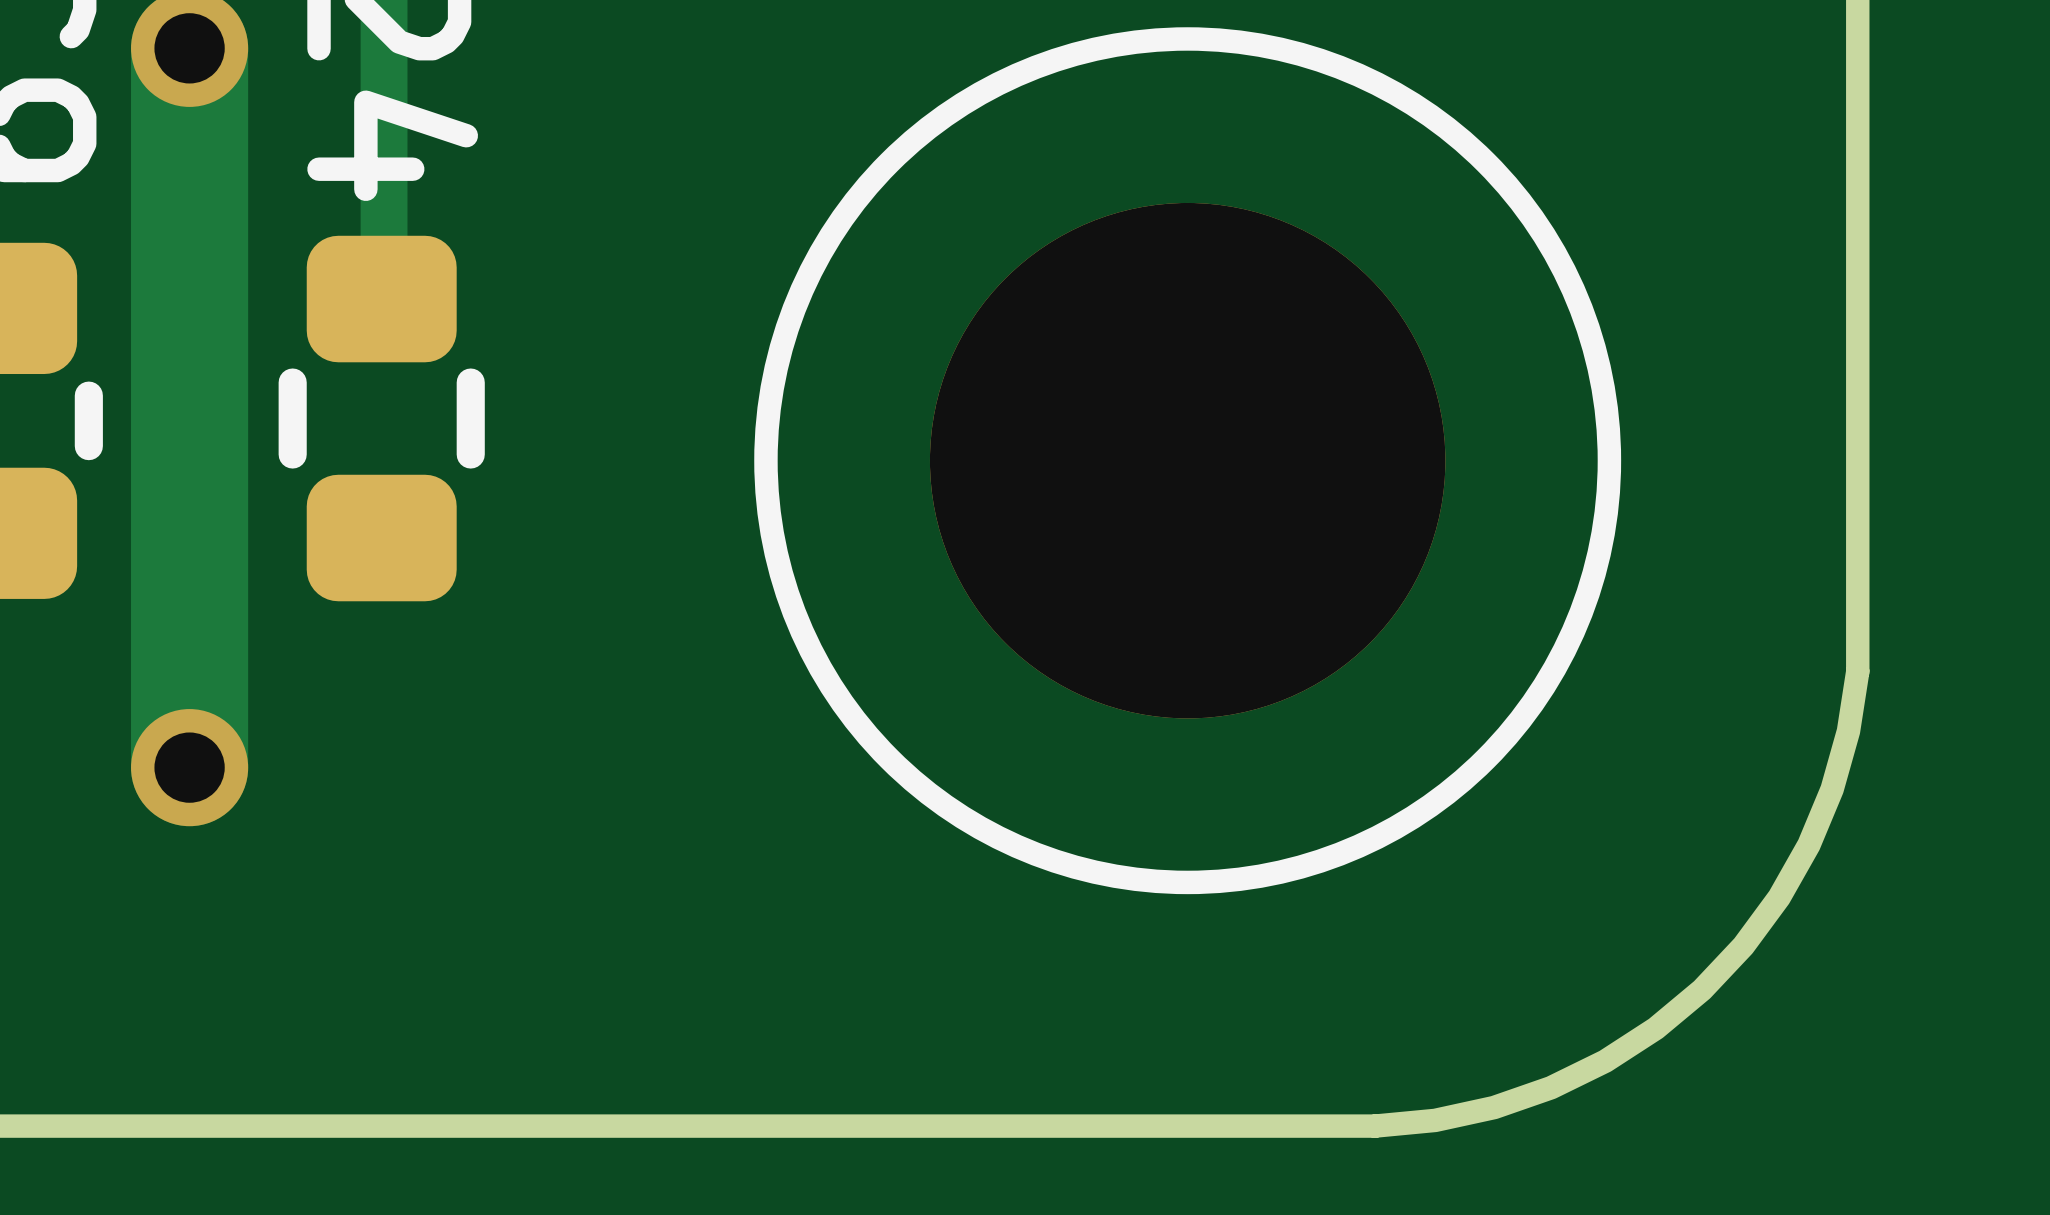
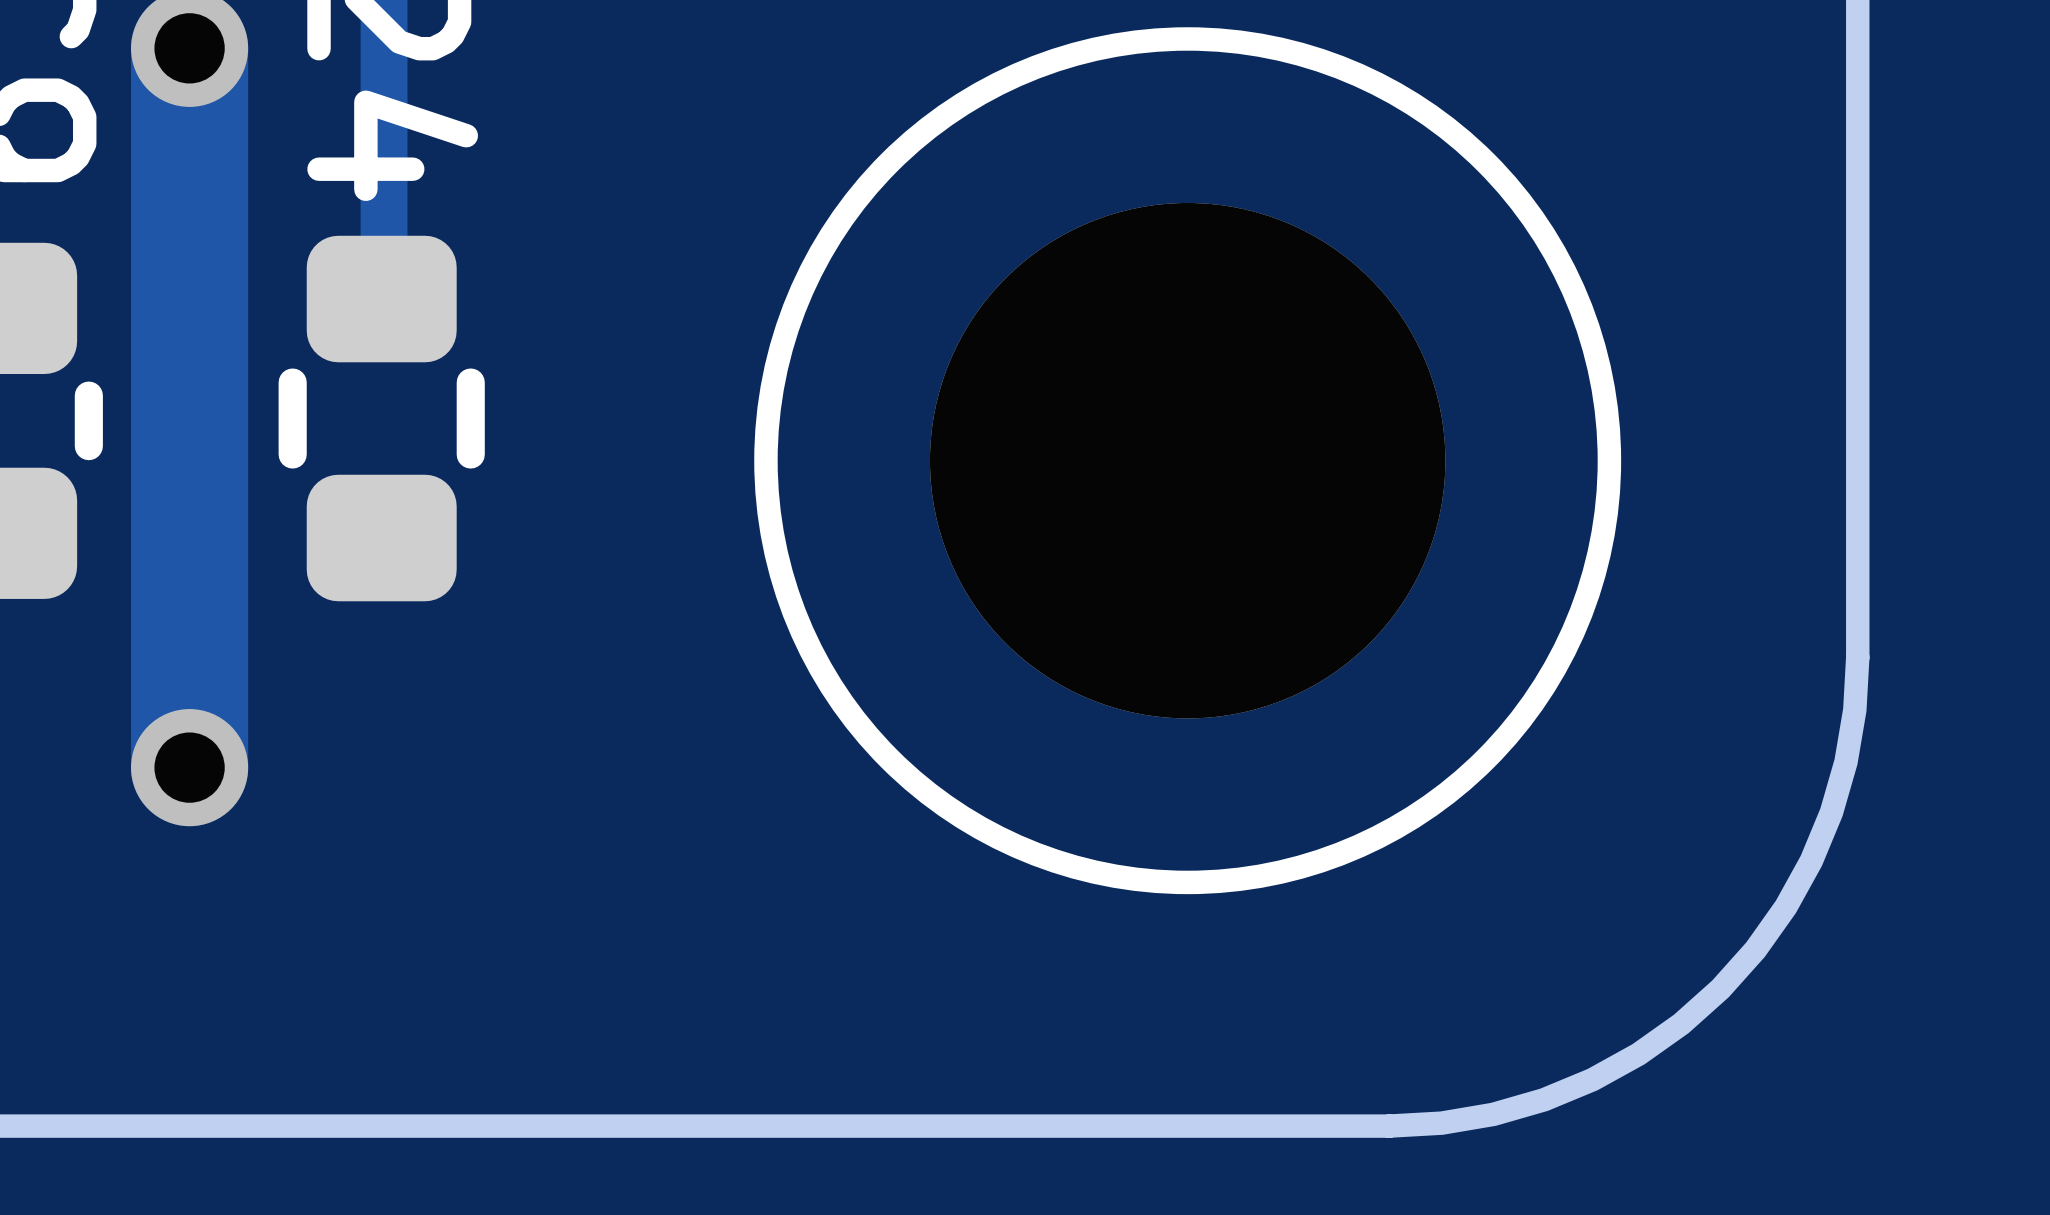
board edge: (1857, 657) (1857, 671) (1848, 731) (1832, 789) (1808, 844) (1779, 897) (1743, 945) (1702, 989) (1655, 1028) (1605, 1061) (1551, 1087) (1494, 1107) (1435, 1120) (1375, 1126) -> (1857, 657) (1854, 709) (1846, 761) (1831, 812) (1811, 860) (1785, 906) (1755, 949) (1720, 988) (1681, 1023) (1638, 1054) (1592, 1079) (1543, 1099) (1493, 1114) (1441, 1123) (1375, 1126)

